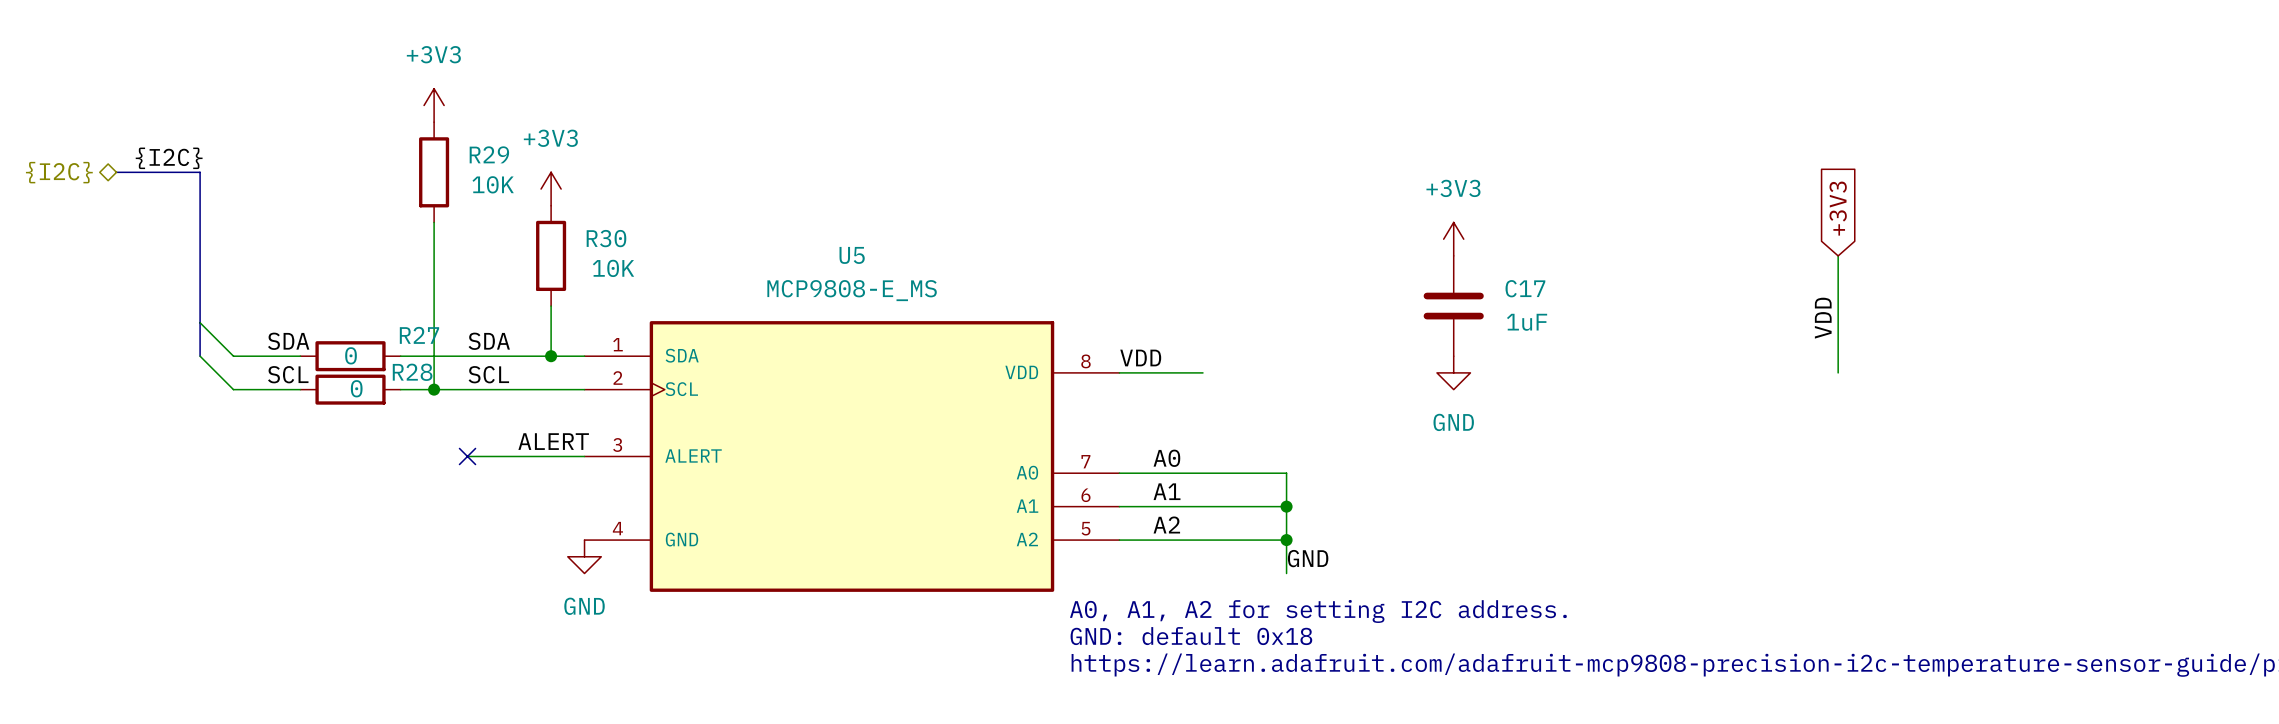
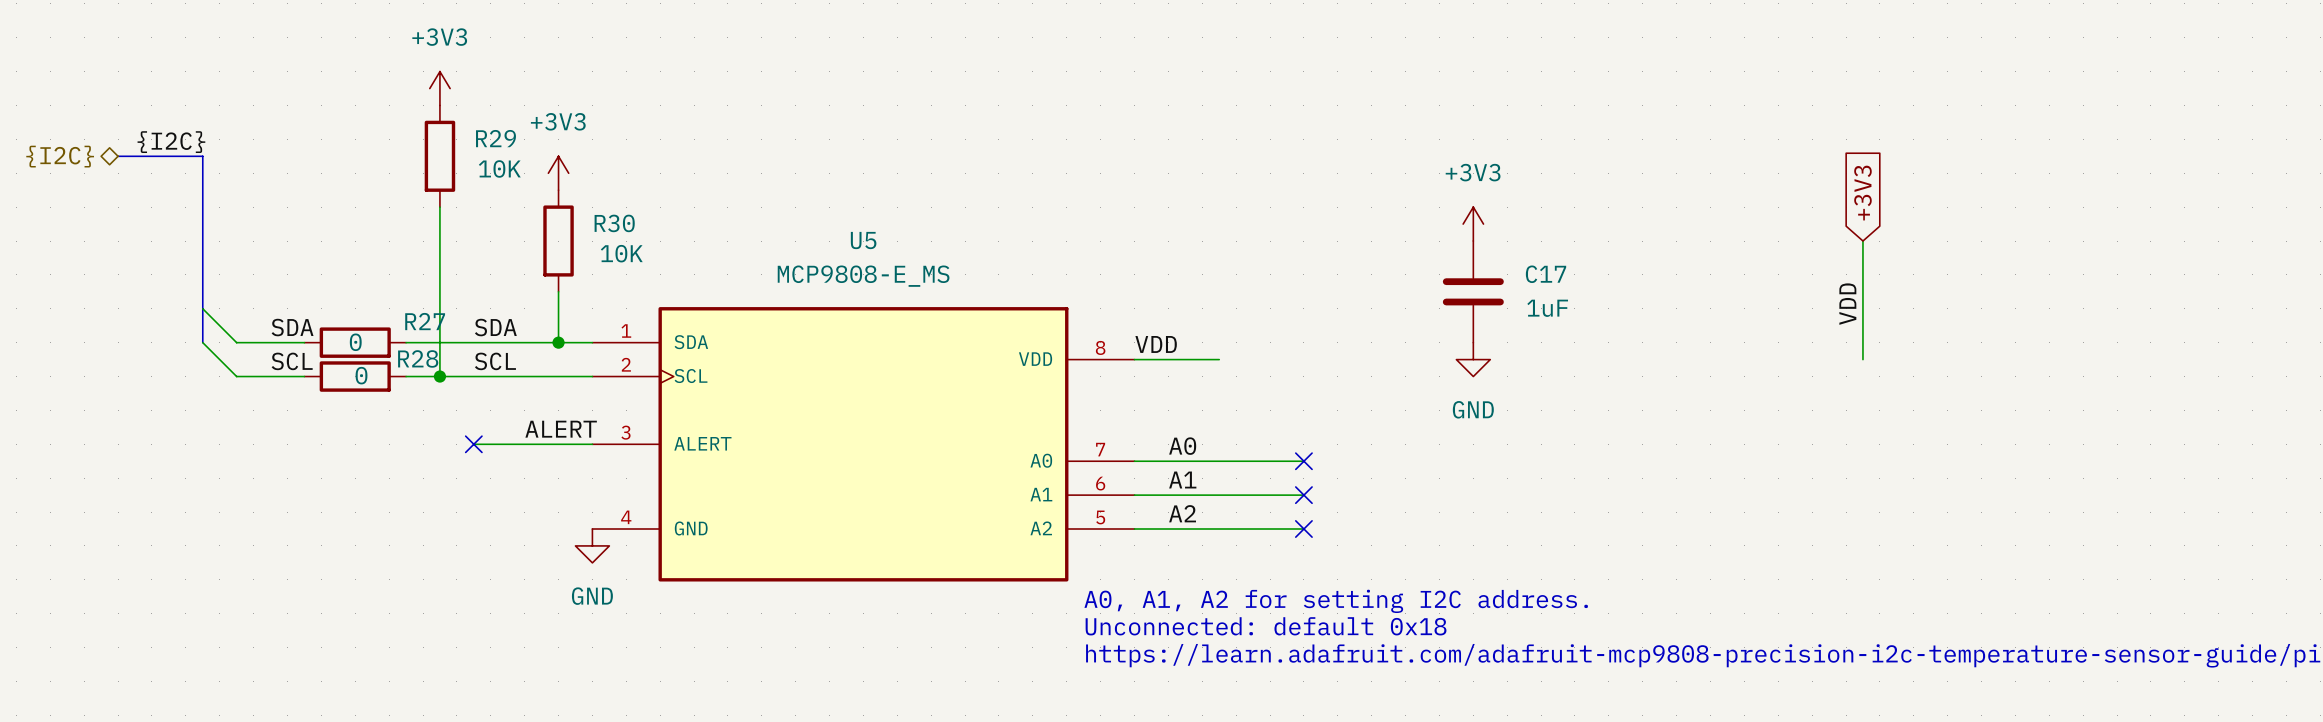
wire: (1286, 473) (1286, 573) -> none
no-connect mark: none -> (1303, 461)
junction: (1286, 506) -> none
no-connect mark: none -> (1303, 495)
junction: (1286, 540) -> none
no-connect mark: none -> (1303, 529)
label: GND (1308, 558) -> none
text: GND: default 0x18 (1191, 636) -> Unconnected: default 0x18 (1266, 626)

